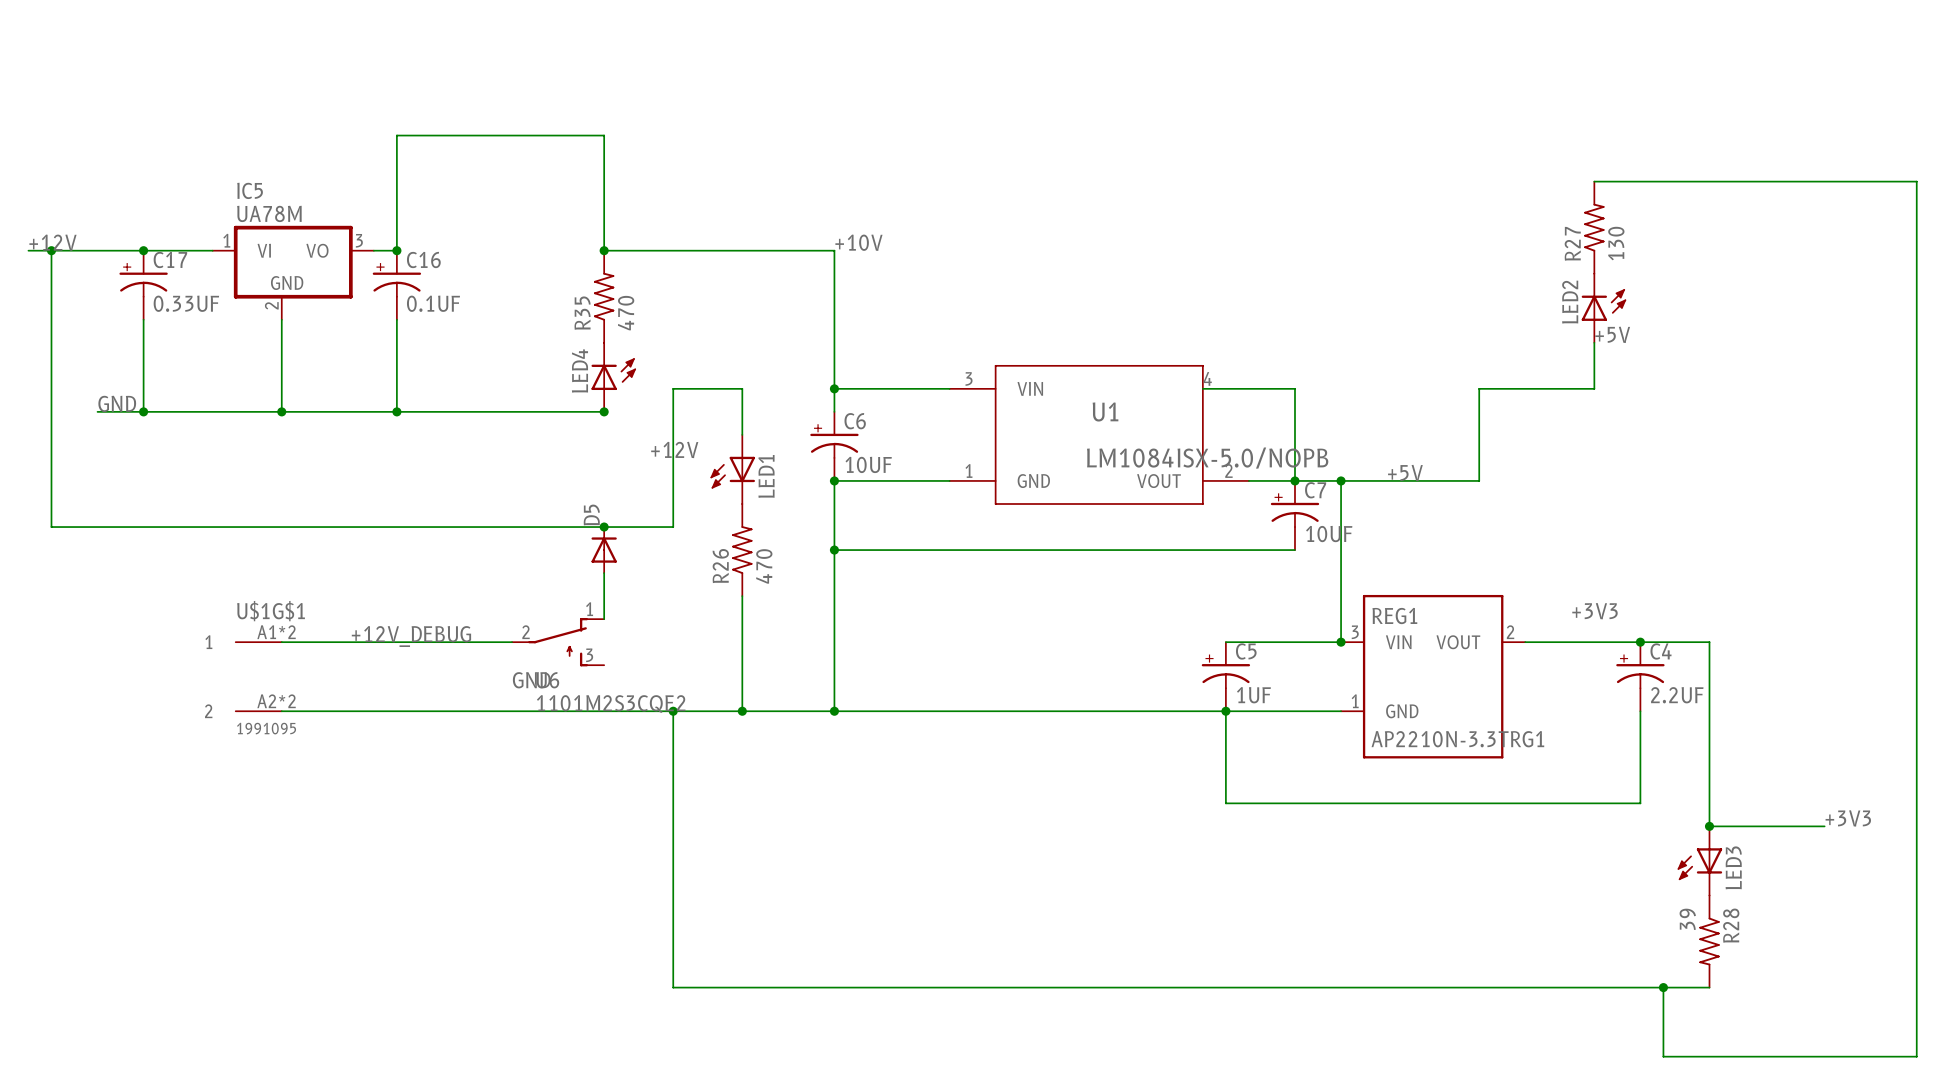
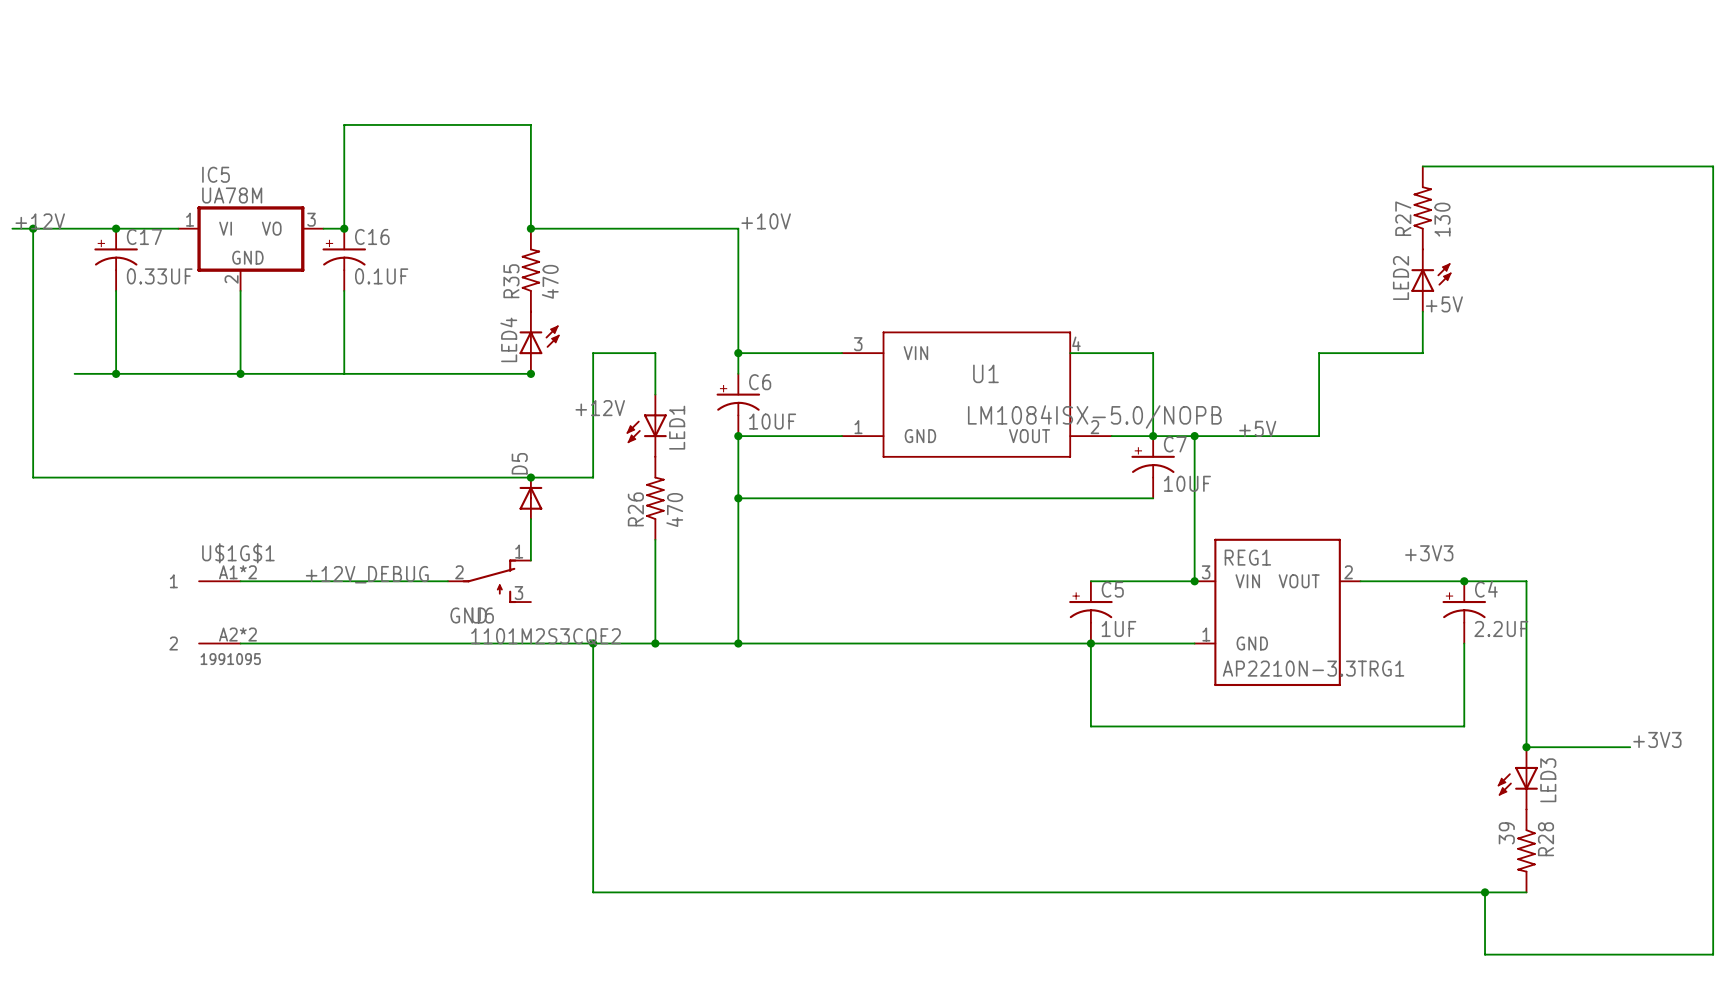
label: GND (117, 403) -> none
junction: (396, 411) -> none

